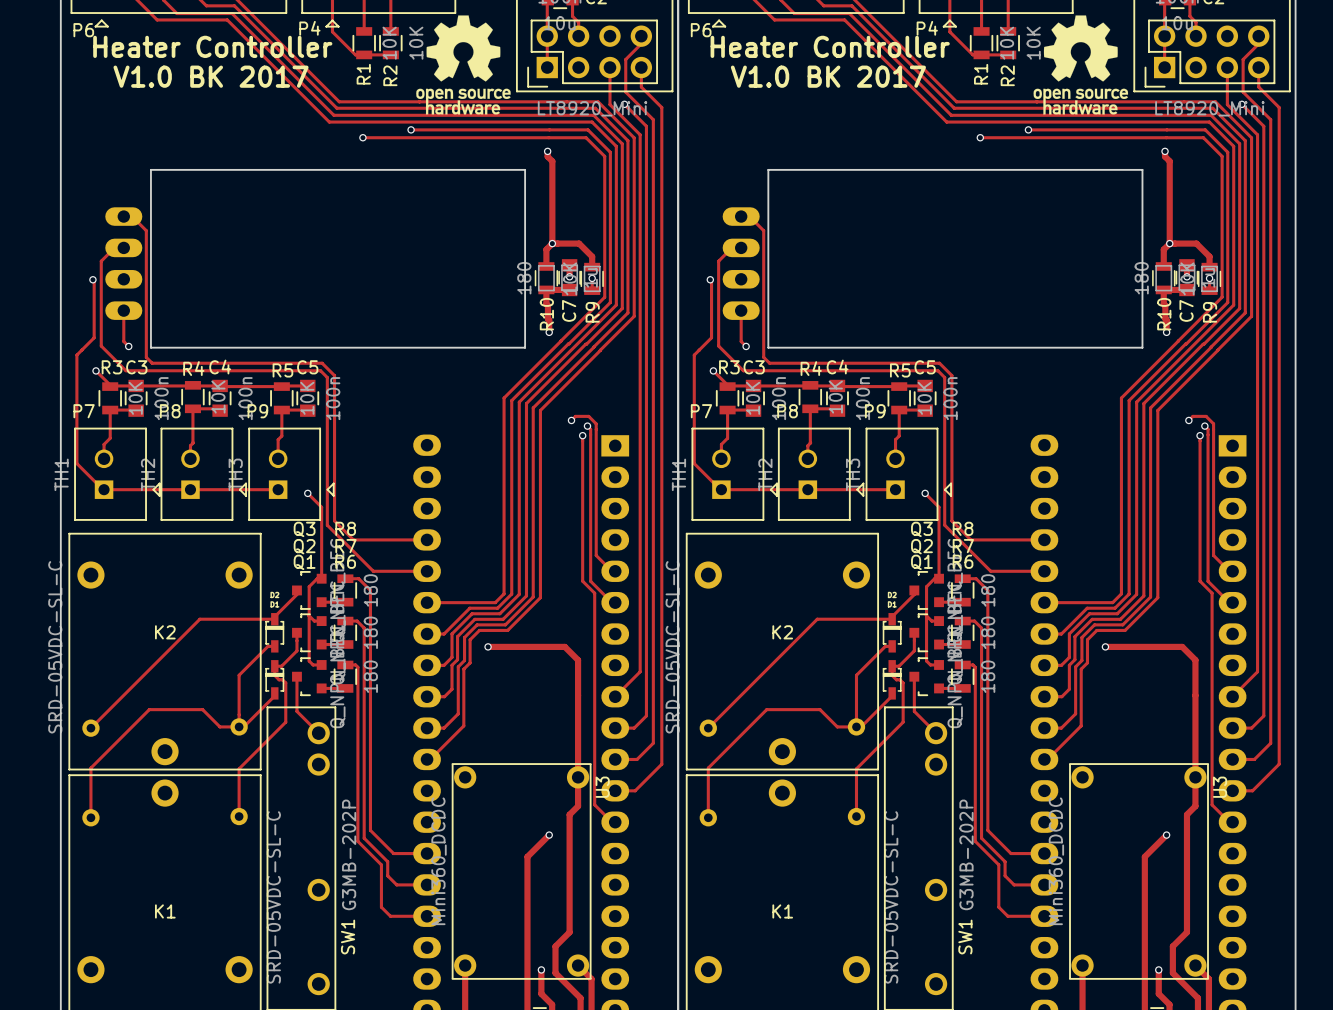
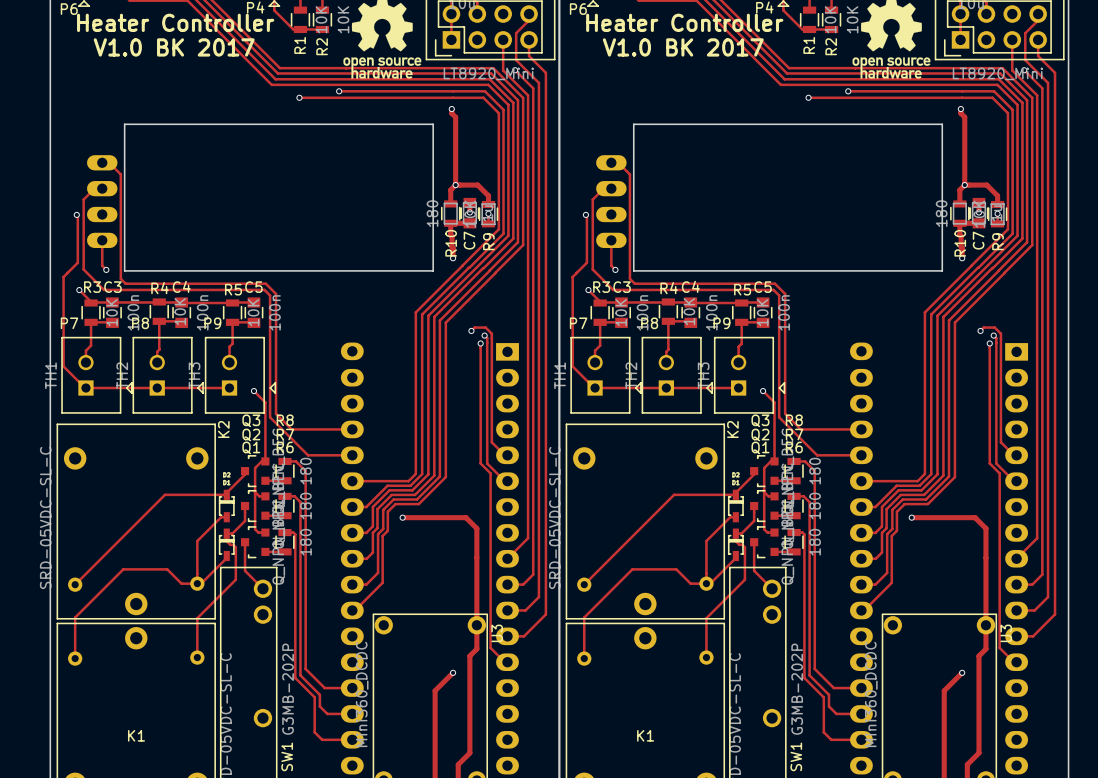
K2 name rotation: 0° (165, 632) -> 90° counterclockwise (223, 429)
K2 name position: K2 (165, 632) -> K2 (223, 429)
K2 name rotation: 0° (782, 632) -> 90° counterclockwise (732, 429)
K2 name position: K2 (782, 632) -> K2 (732, 429)

